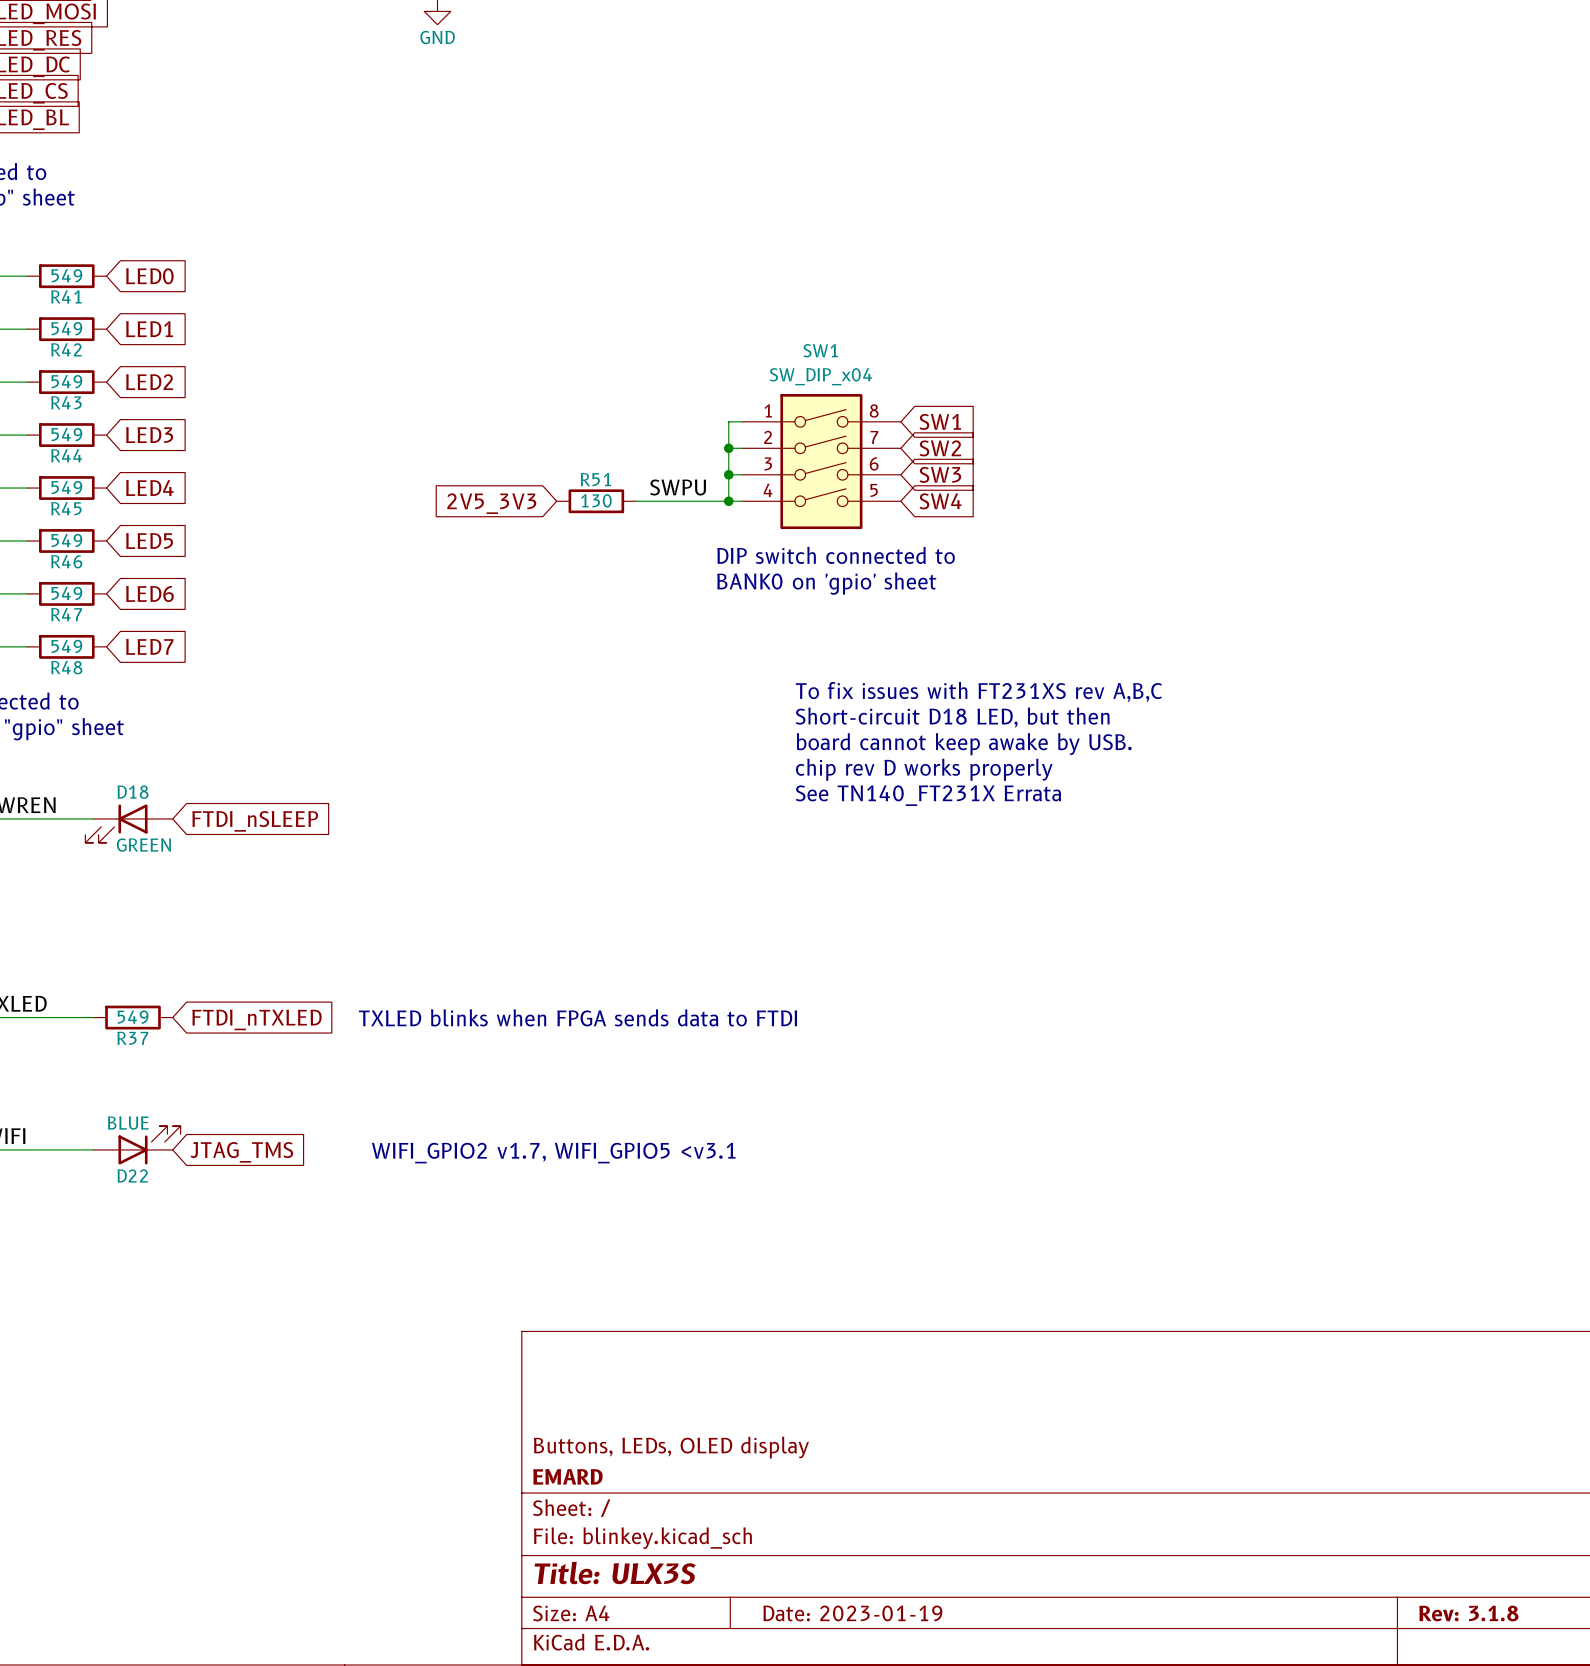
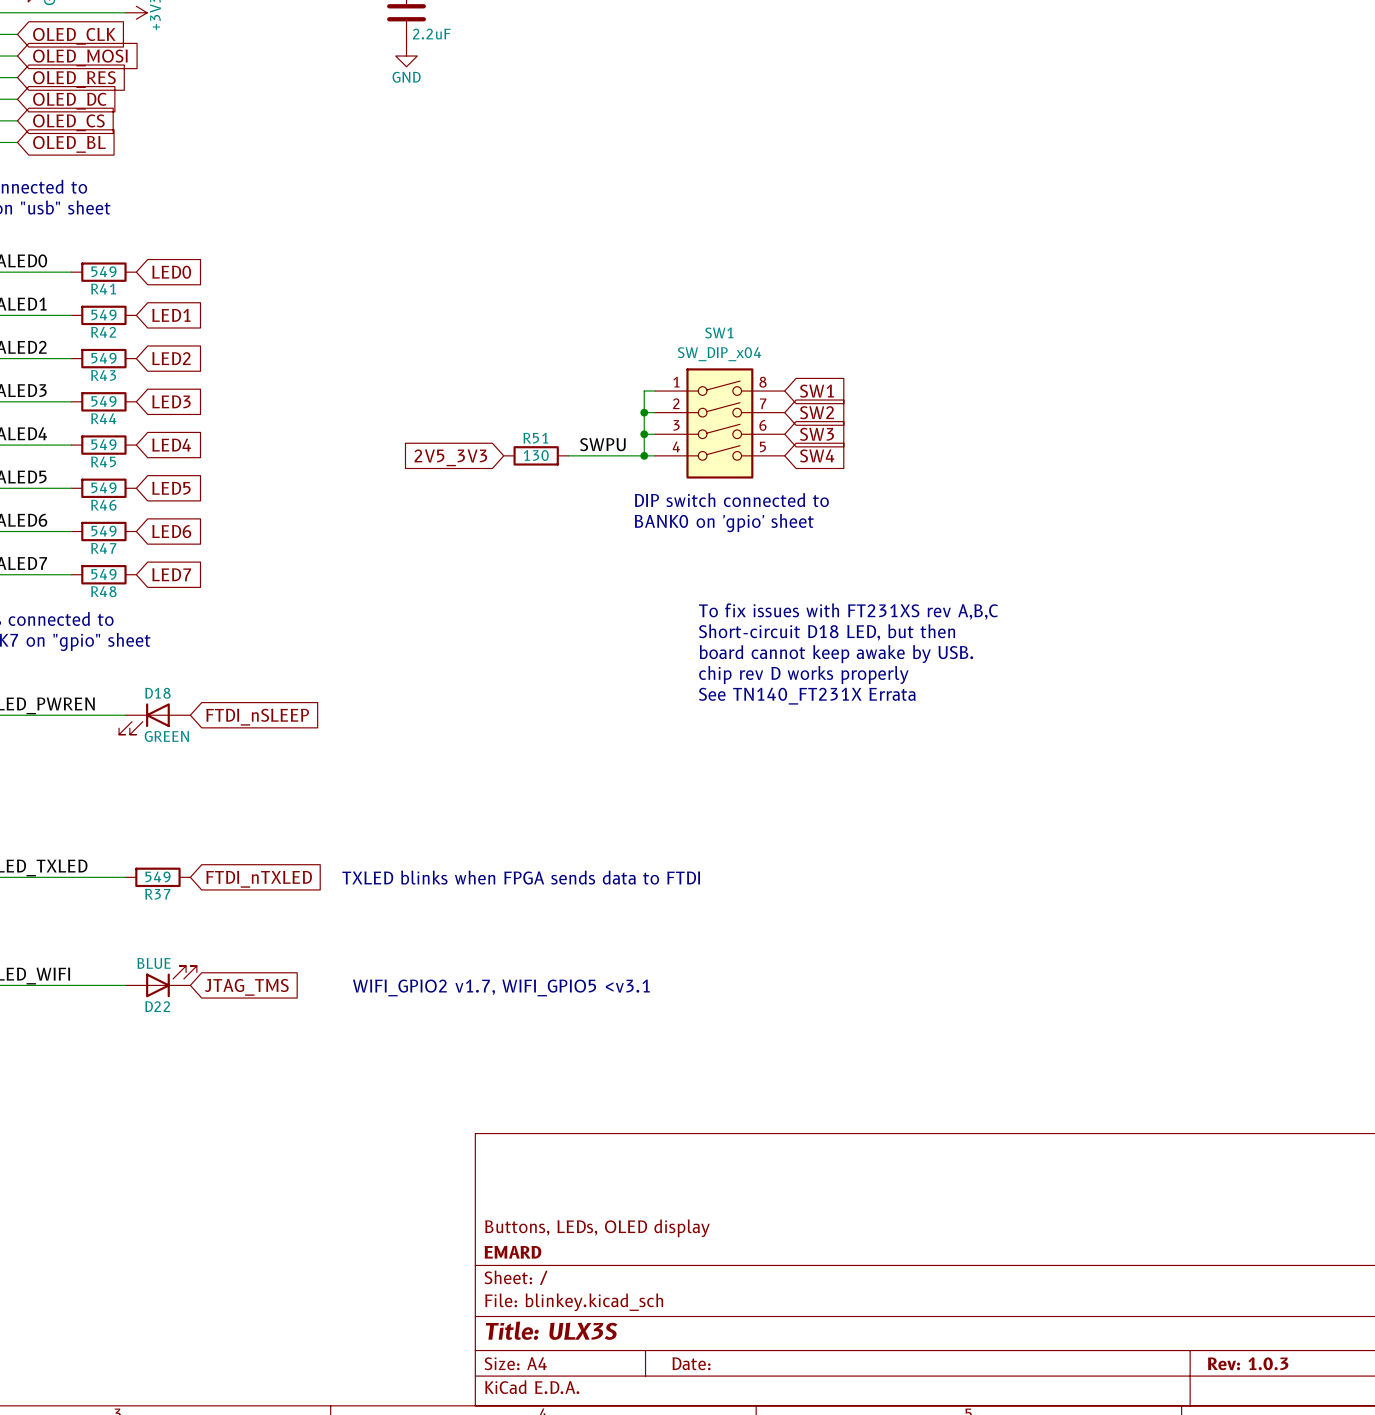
title block: Date: 2023-01-19 (852, 1613) -> Date: (691, 1363)
title block: Rev: 3.1.8 (1468, 1613) -> Rev: 1.0.3 (1248, 1363)

